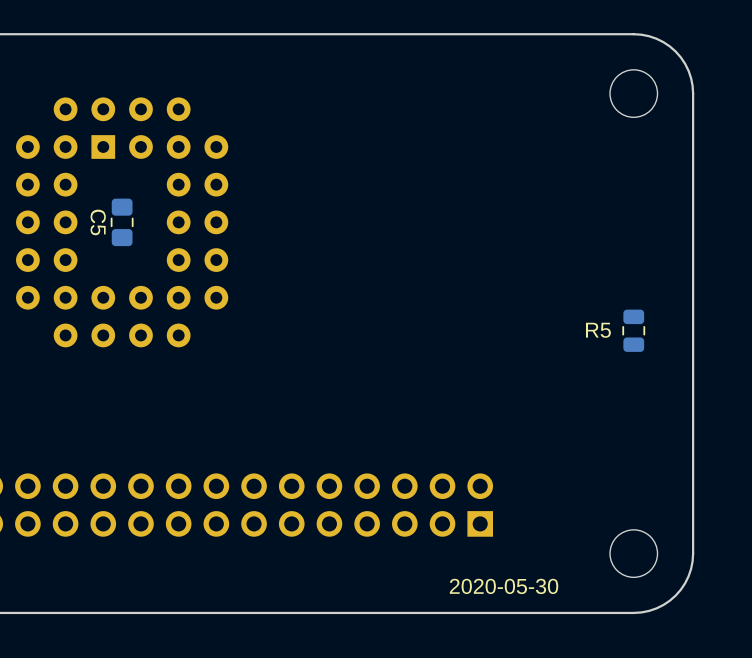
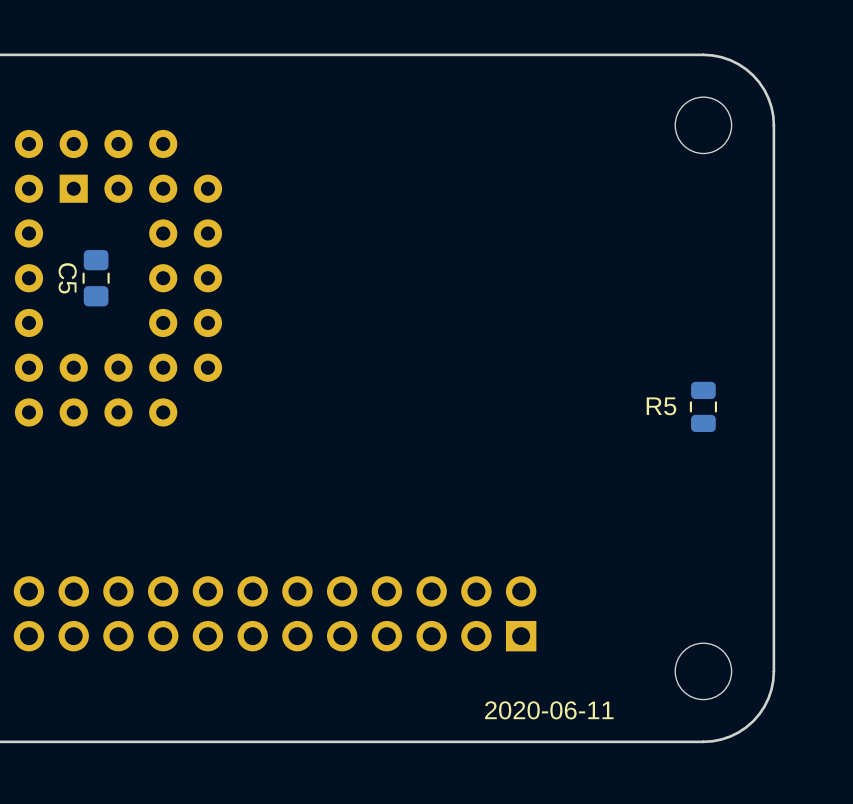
text: 2020-05-30 (504, 586) -> 2020-06-11 (549, 710)

